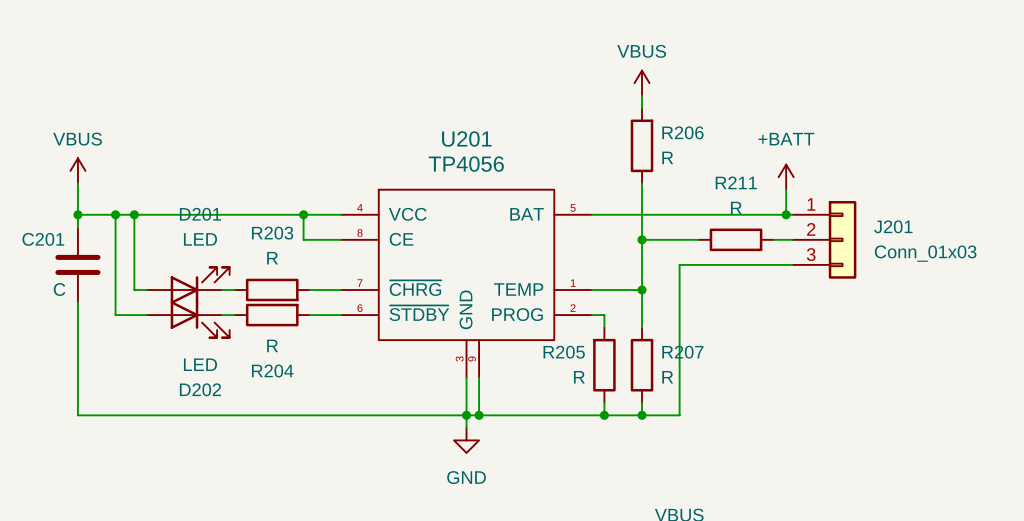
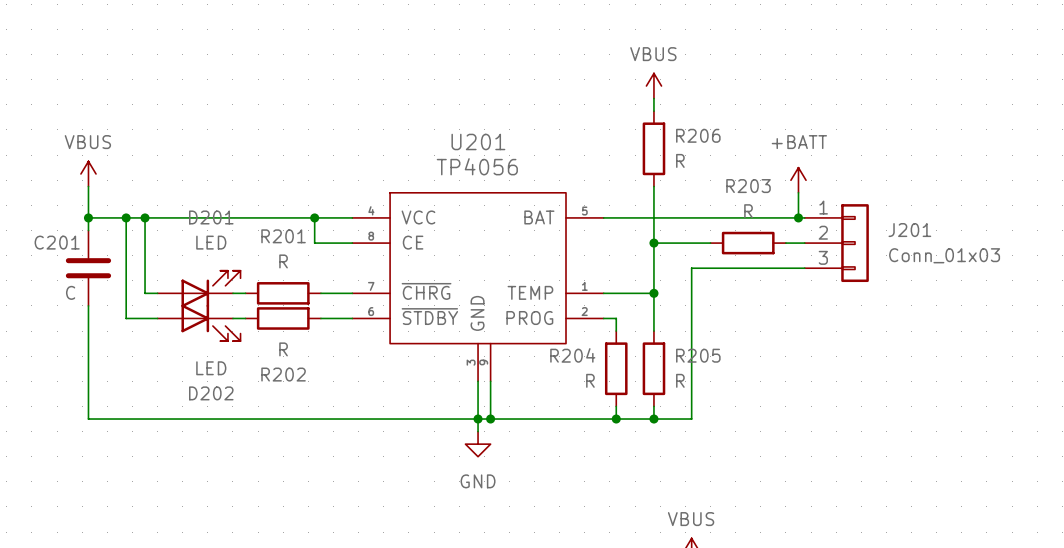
R211 name: R211 (736, 182) -> R203 (748, 186)
R203 name: R203 (272, 233) -> R201 (283, 236)
R205 name: R205 (564, 352) -> R204 (572, 355)
R207 name: R207 (682, 352) -> R205 (698, 355)
R204 name: R204 (272, 370) -> R202 (283, 374)

